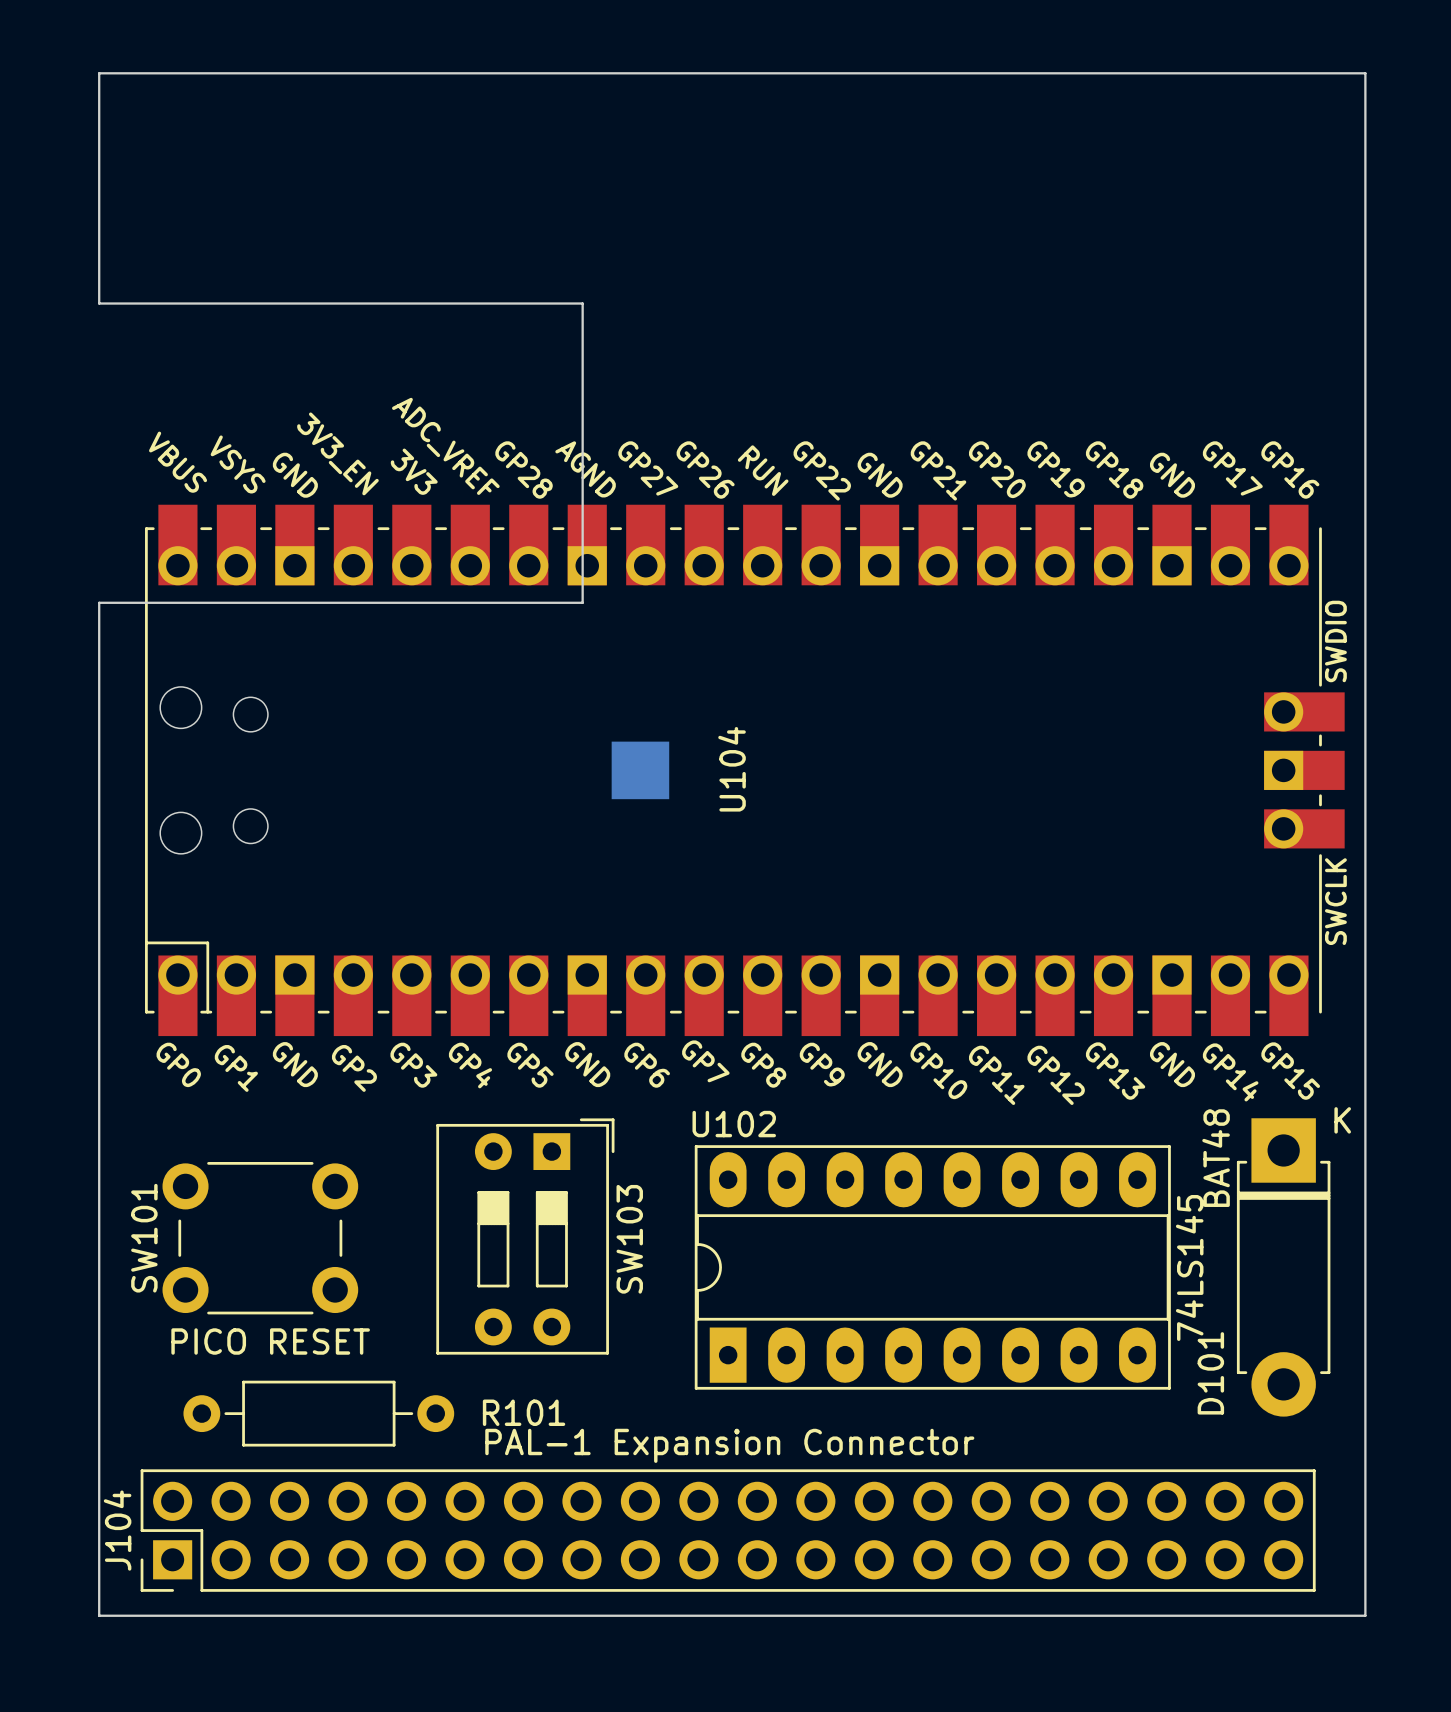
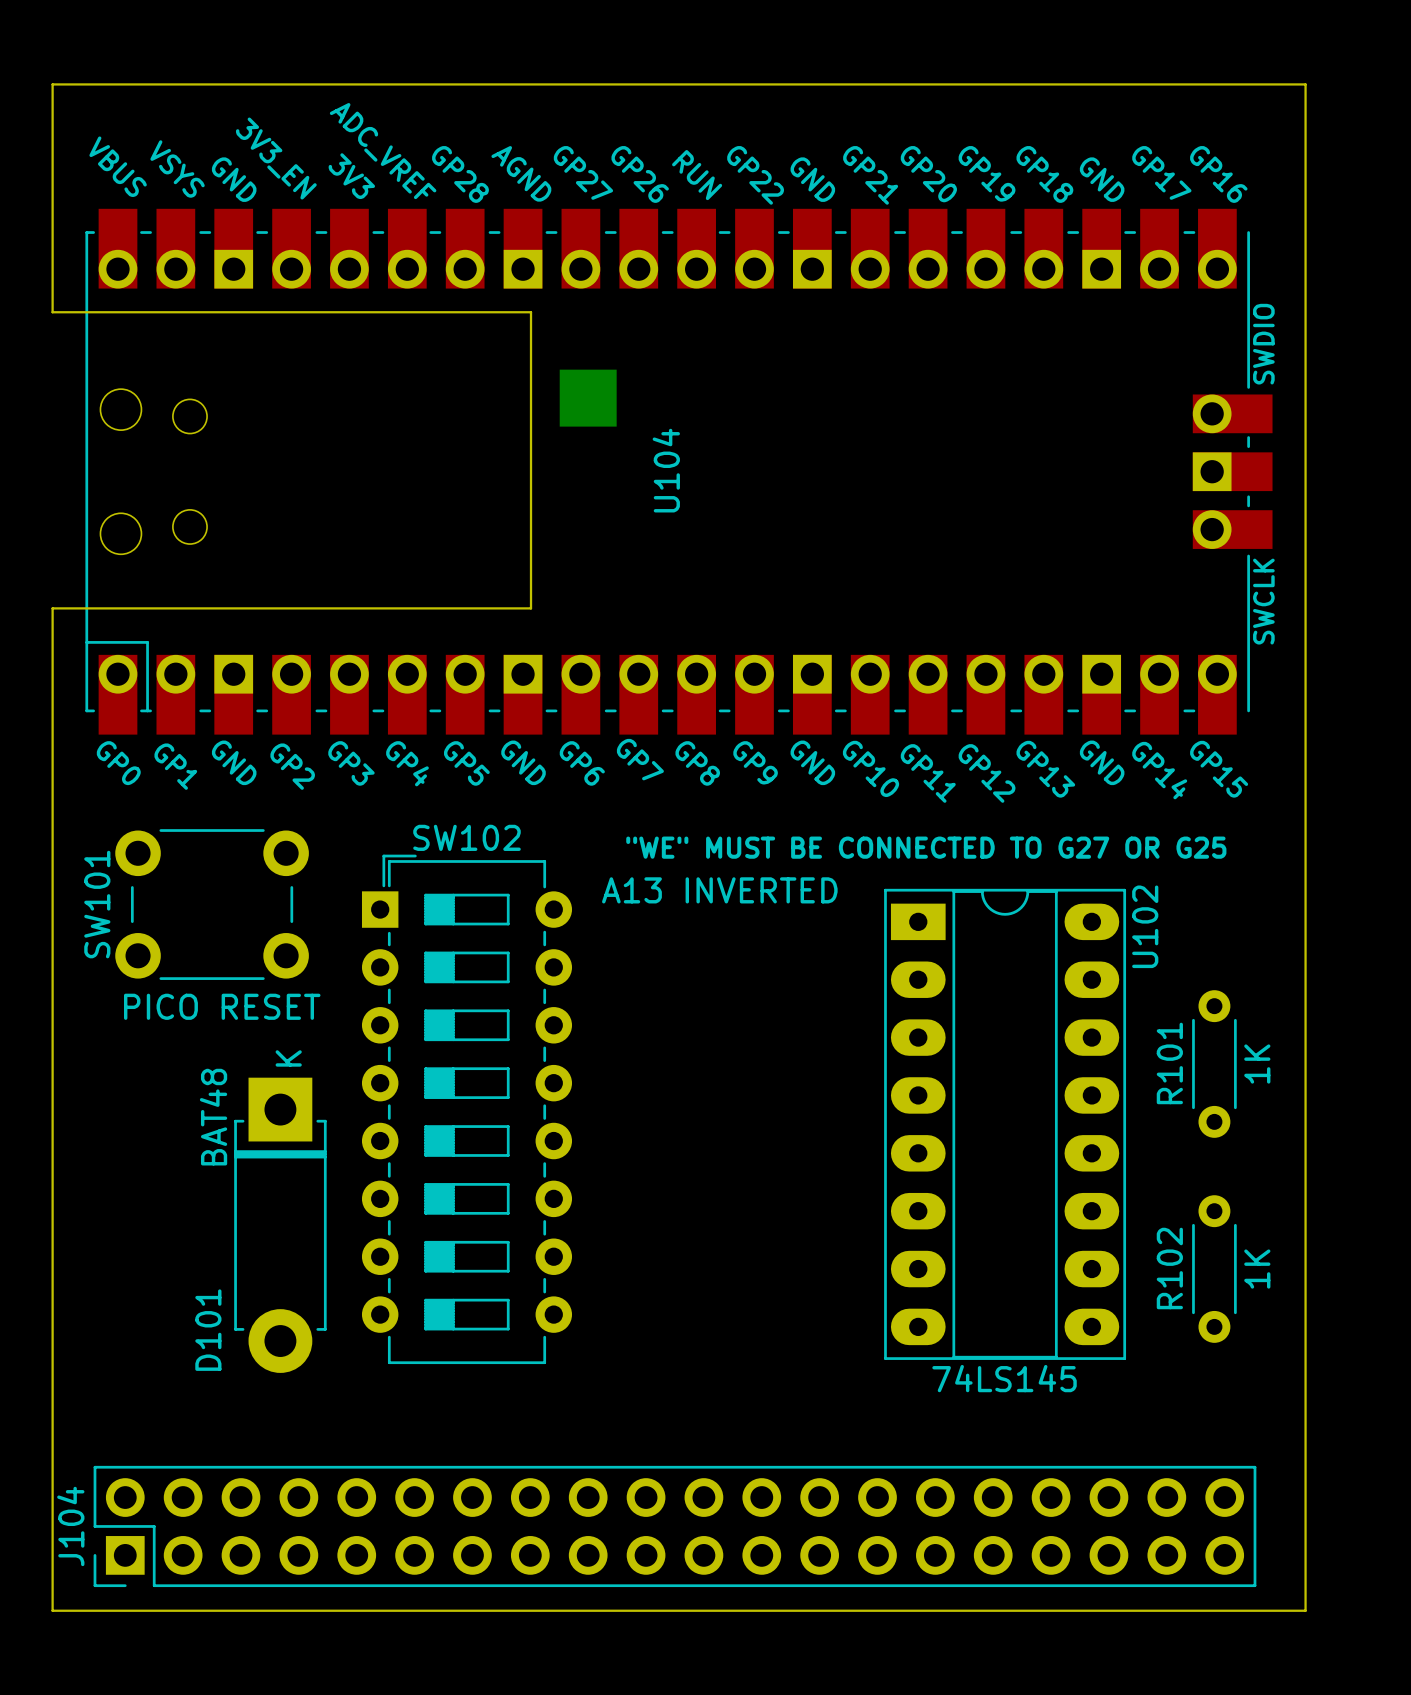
part position: (640, 770) -> (588, 398)
U104 position: (744, 770) -> (678, 471)
text: none -> "WE" MUST BE CONNECTED TO G27 OR G25 (926, 847)
text: none -> A13 INVERTED (719, 890)
R101 value: none -> 1K (1257, 1064)
SW102: none -> (466, 1109)
D101 text rotation: 0° (1342, 1120) -> 90° counterclockwise (288, 1058)
D101 text position: K (1342, 1120) -> K (288, 1058)
SW103: (525, 1236) -> none
SW101 position: (260, 1238) -> (212, 904)
U102 rotation: 0° (932, 1267) -> 90° clockwise (1005, 1124)
D101 position: (1283, 1267) -> (280, 1225)
R102: none -> 1K (1214, 1269)
R101 footprint: [183, 1380, 455, 1447] -> [1192, 990, 1237, 1138]
R101 name position: R101 (524, 1412) -> R101 (1169, 1063)
J104 value: PAL-1 Expansion Connector (729, 1445) -> none

